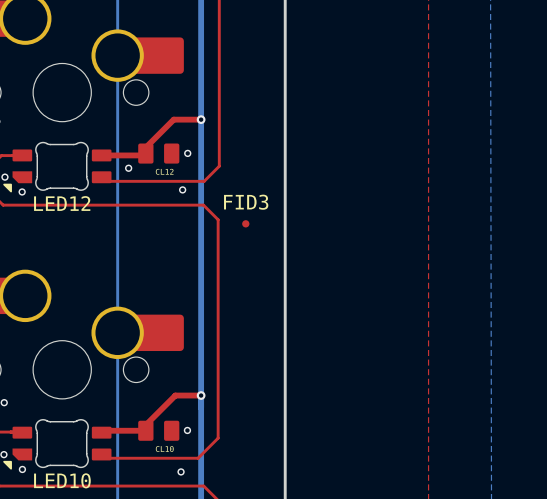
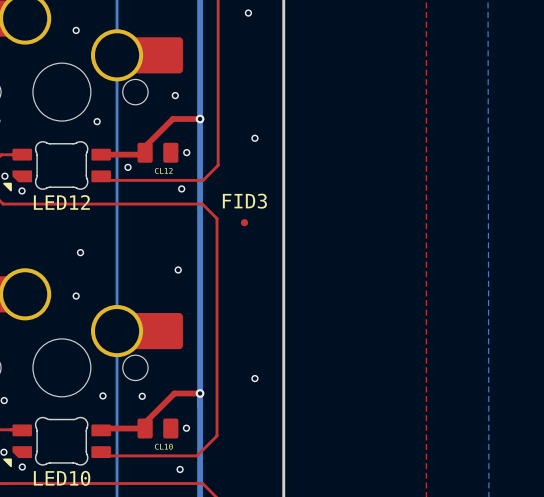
via: none -> (248, 13)
via: none -> (76, 30)
via: none -> (175, 95)
via: none -> (97, 121)
via: none -> (254, 138)
via: none -> (80, 252)
via: none -> (178, 270)
via: none -> (76, 296)
via: none -> (254, 378)
via: none -> (102, 395)
via: none -> (142, 396)

